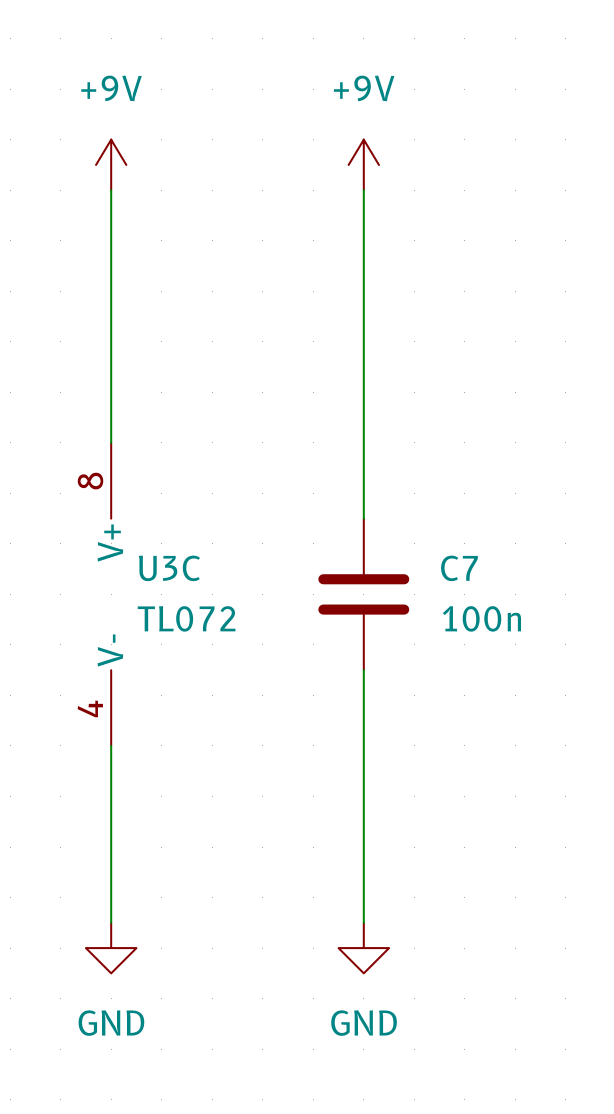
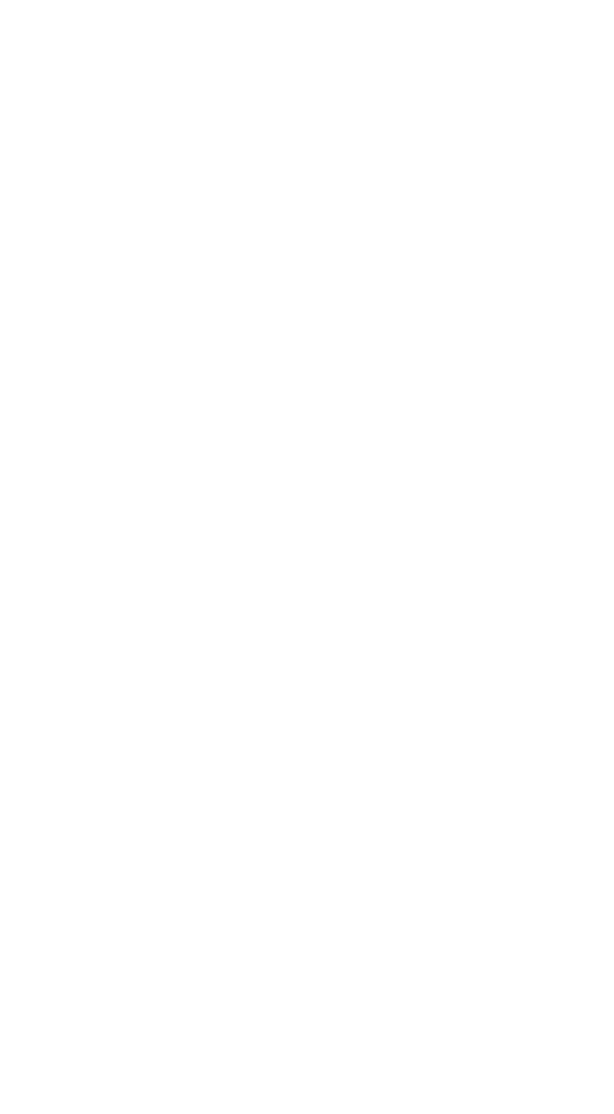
power symbol: +9V (111, 164) -> none
power symbol: +9V (363, 164) -> none
wire: (111, 190) (111, 442) -> none
wire: (363, 190) (363, 518) -> none
U3C: TL072 (111, 594) -> none
C7: 100n (363, 594) -> none
wire: (363, 670) (363, 922) -> none
wire: (111, 745) (111, 922) -> none
power symbol: GND (111, 948) -> none
power symbol: GND (363, 948) -> none

